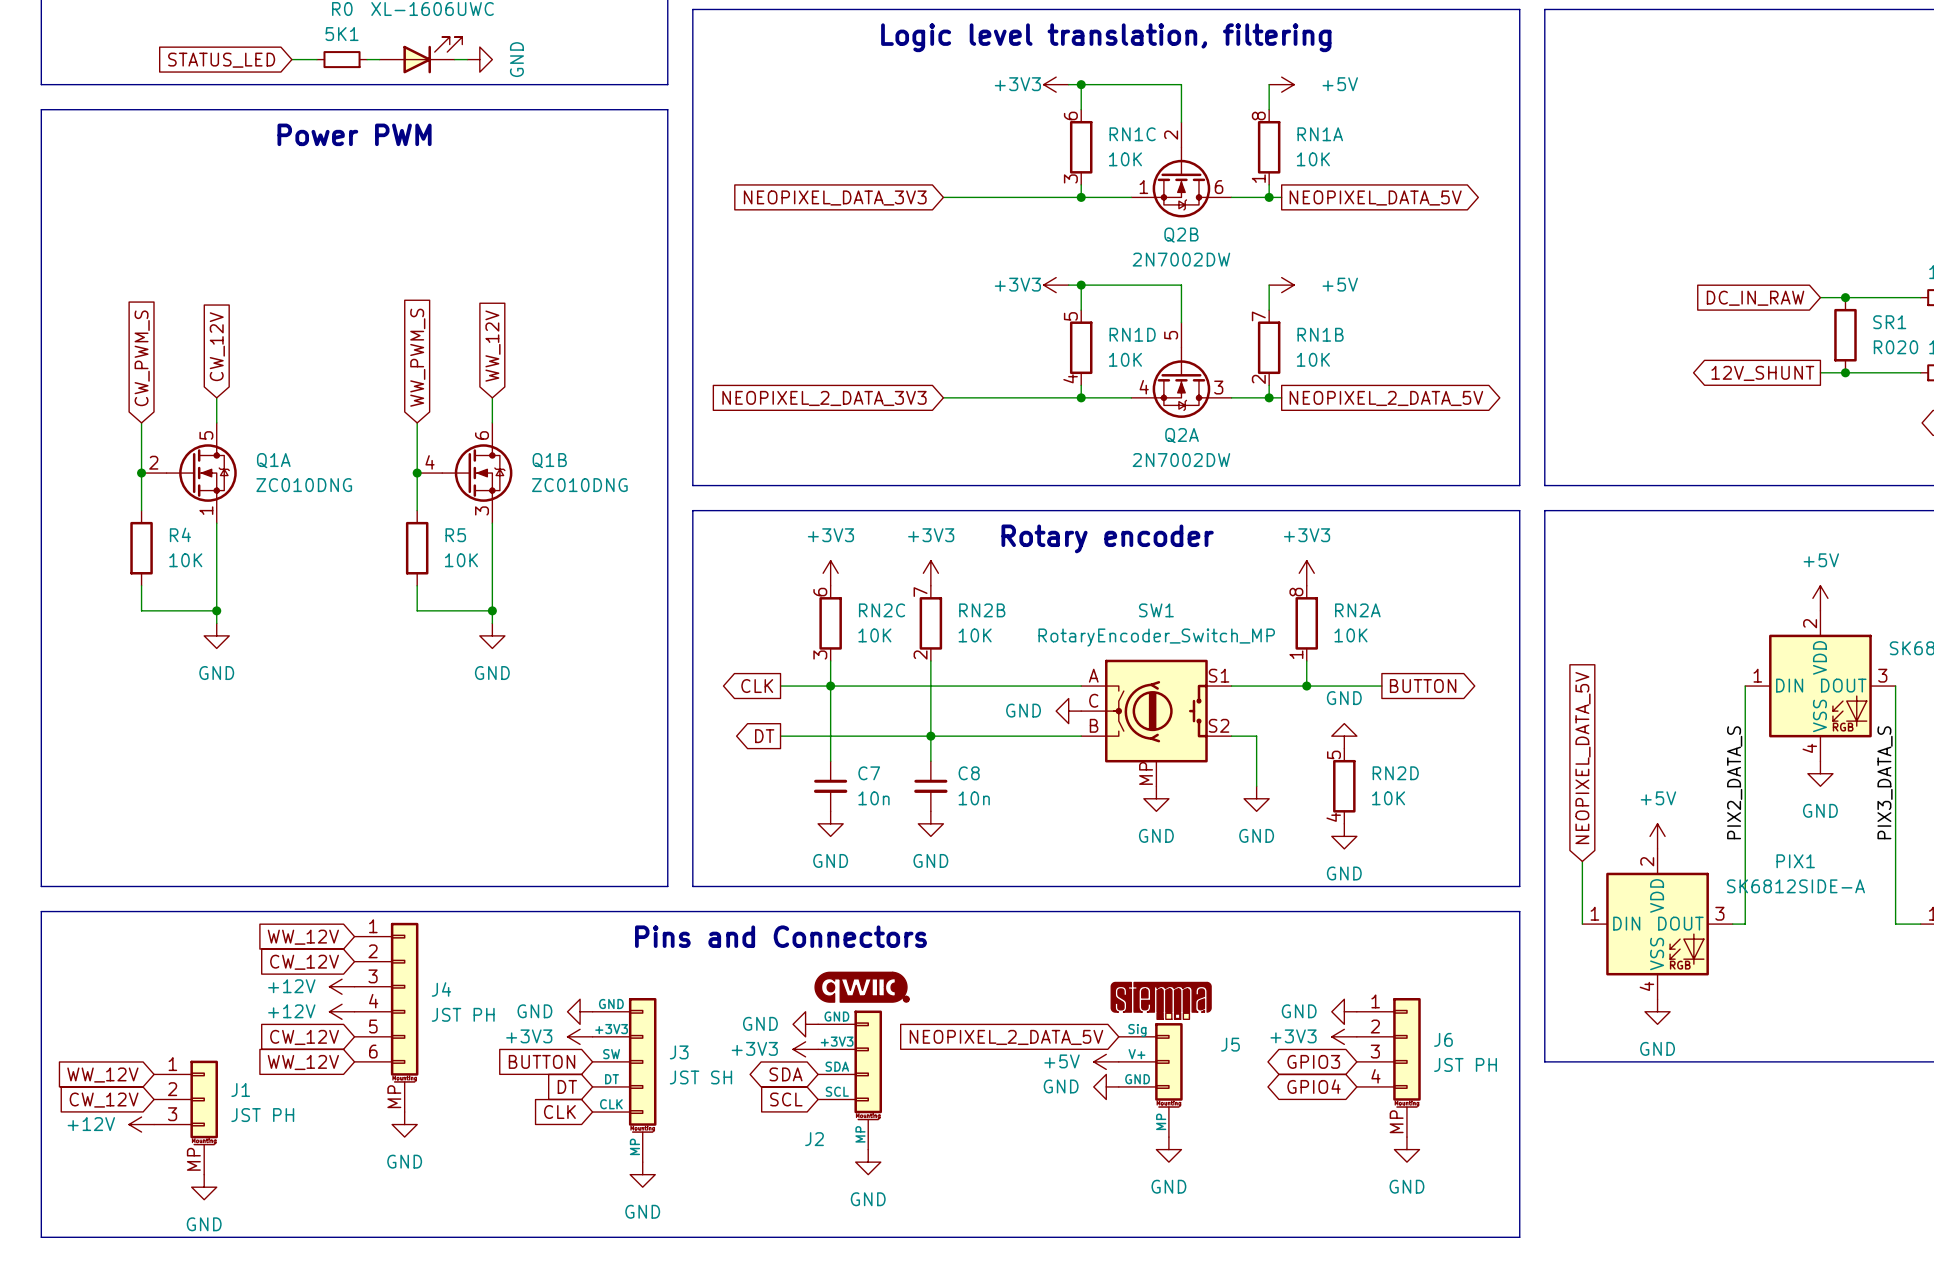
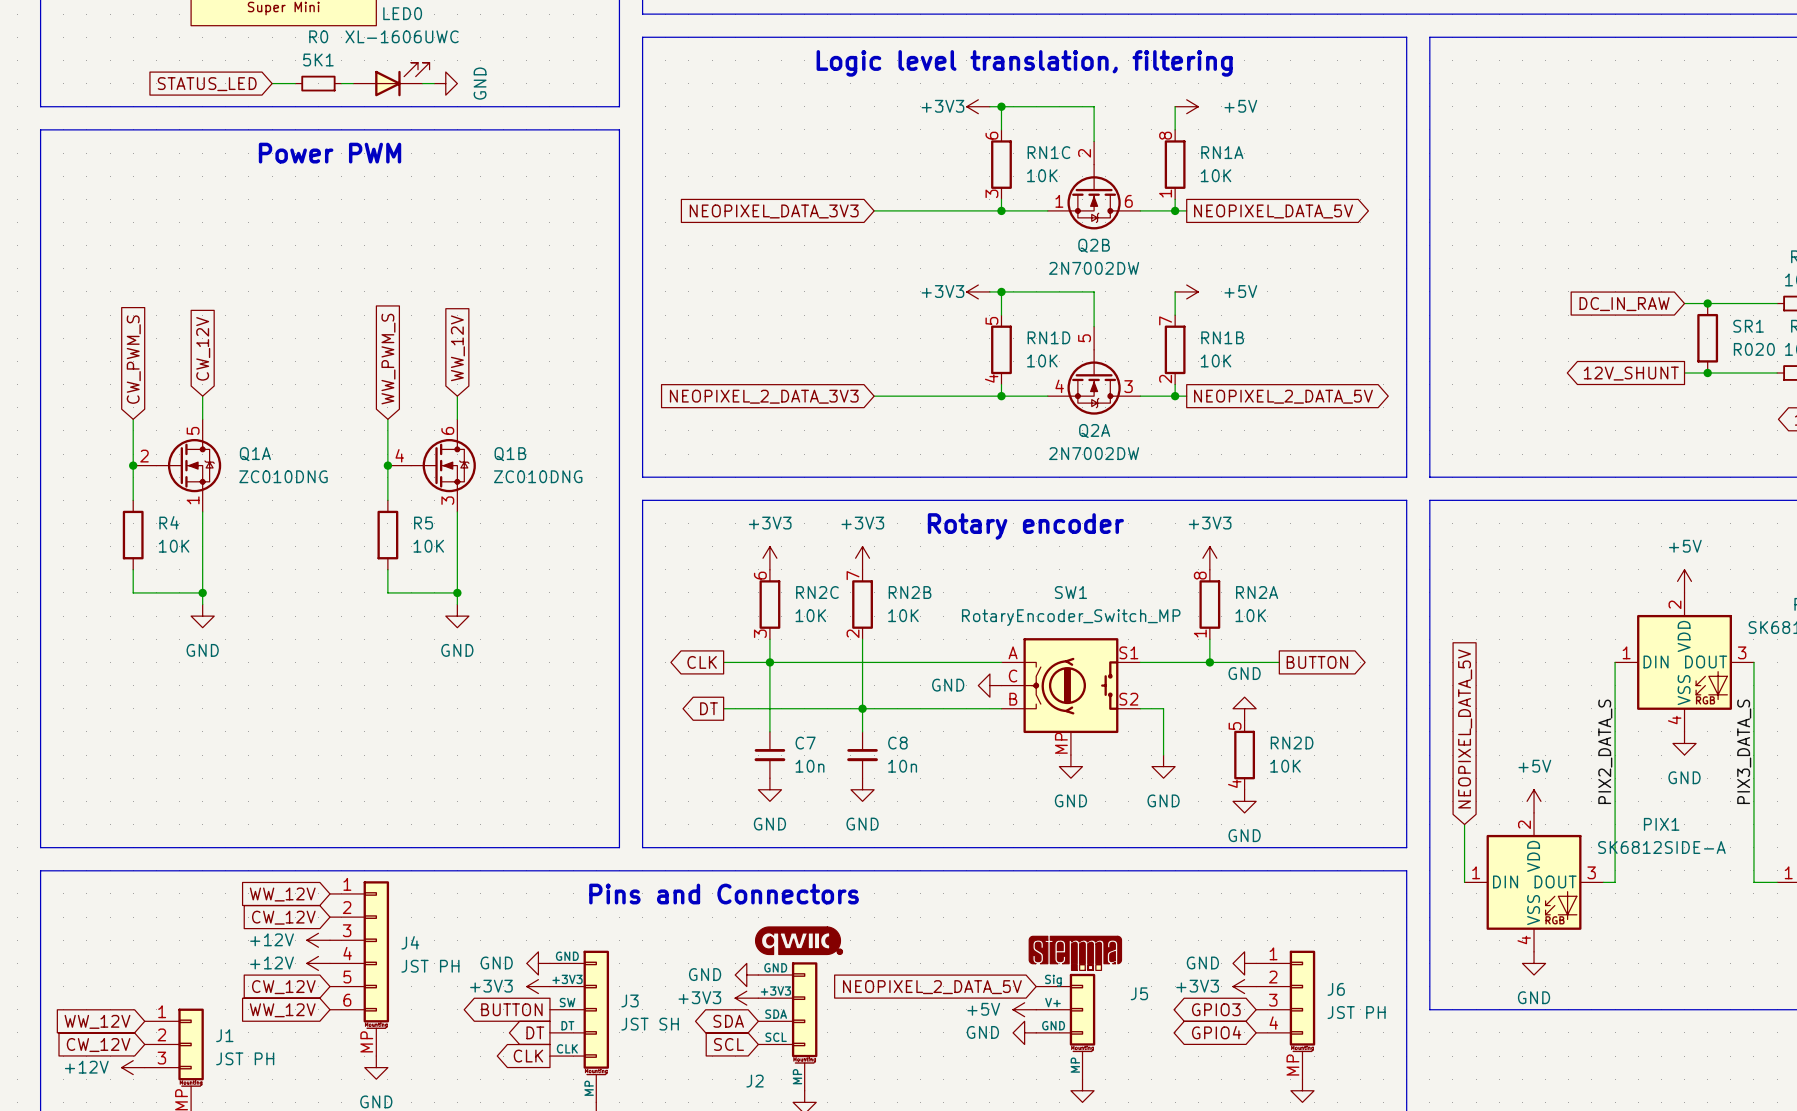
global label shape: input (542, 1061) -> output (511, 1009)
global label shape: input (567, 1086) -> output (535, 1032)
global label shape: input (559, 1112) -> output (528, 1056)

